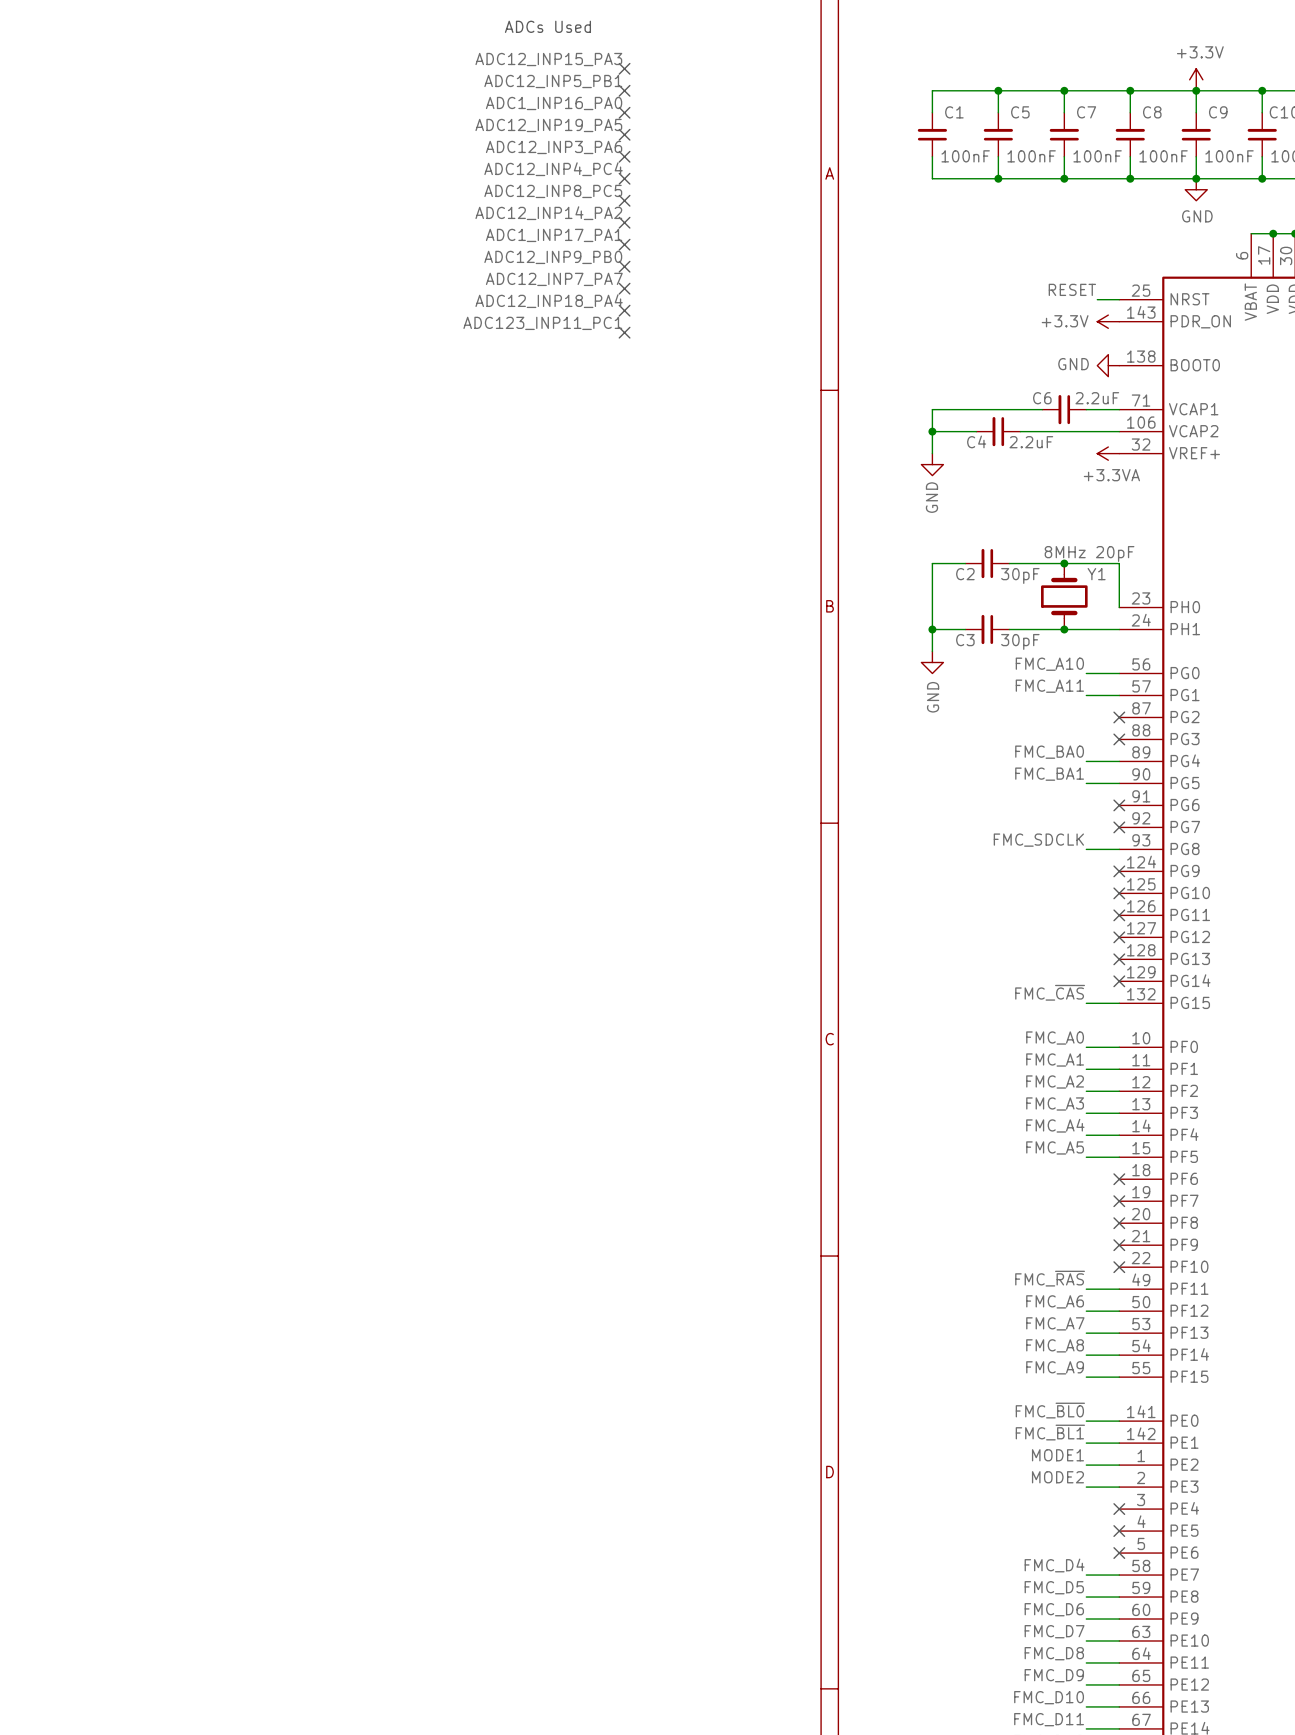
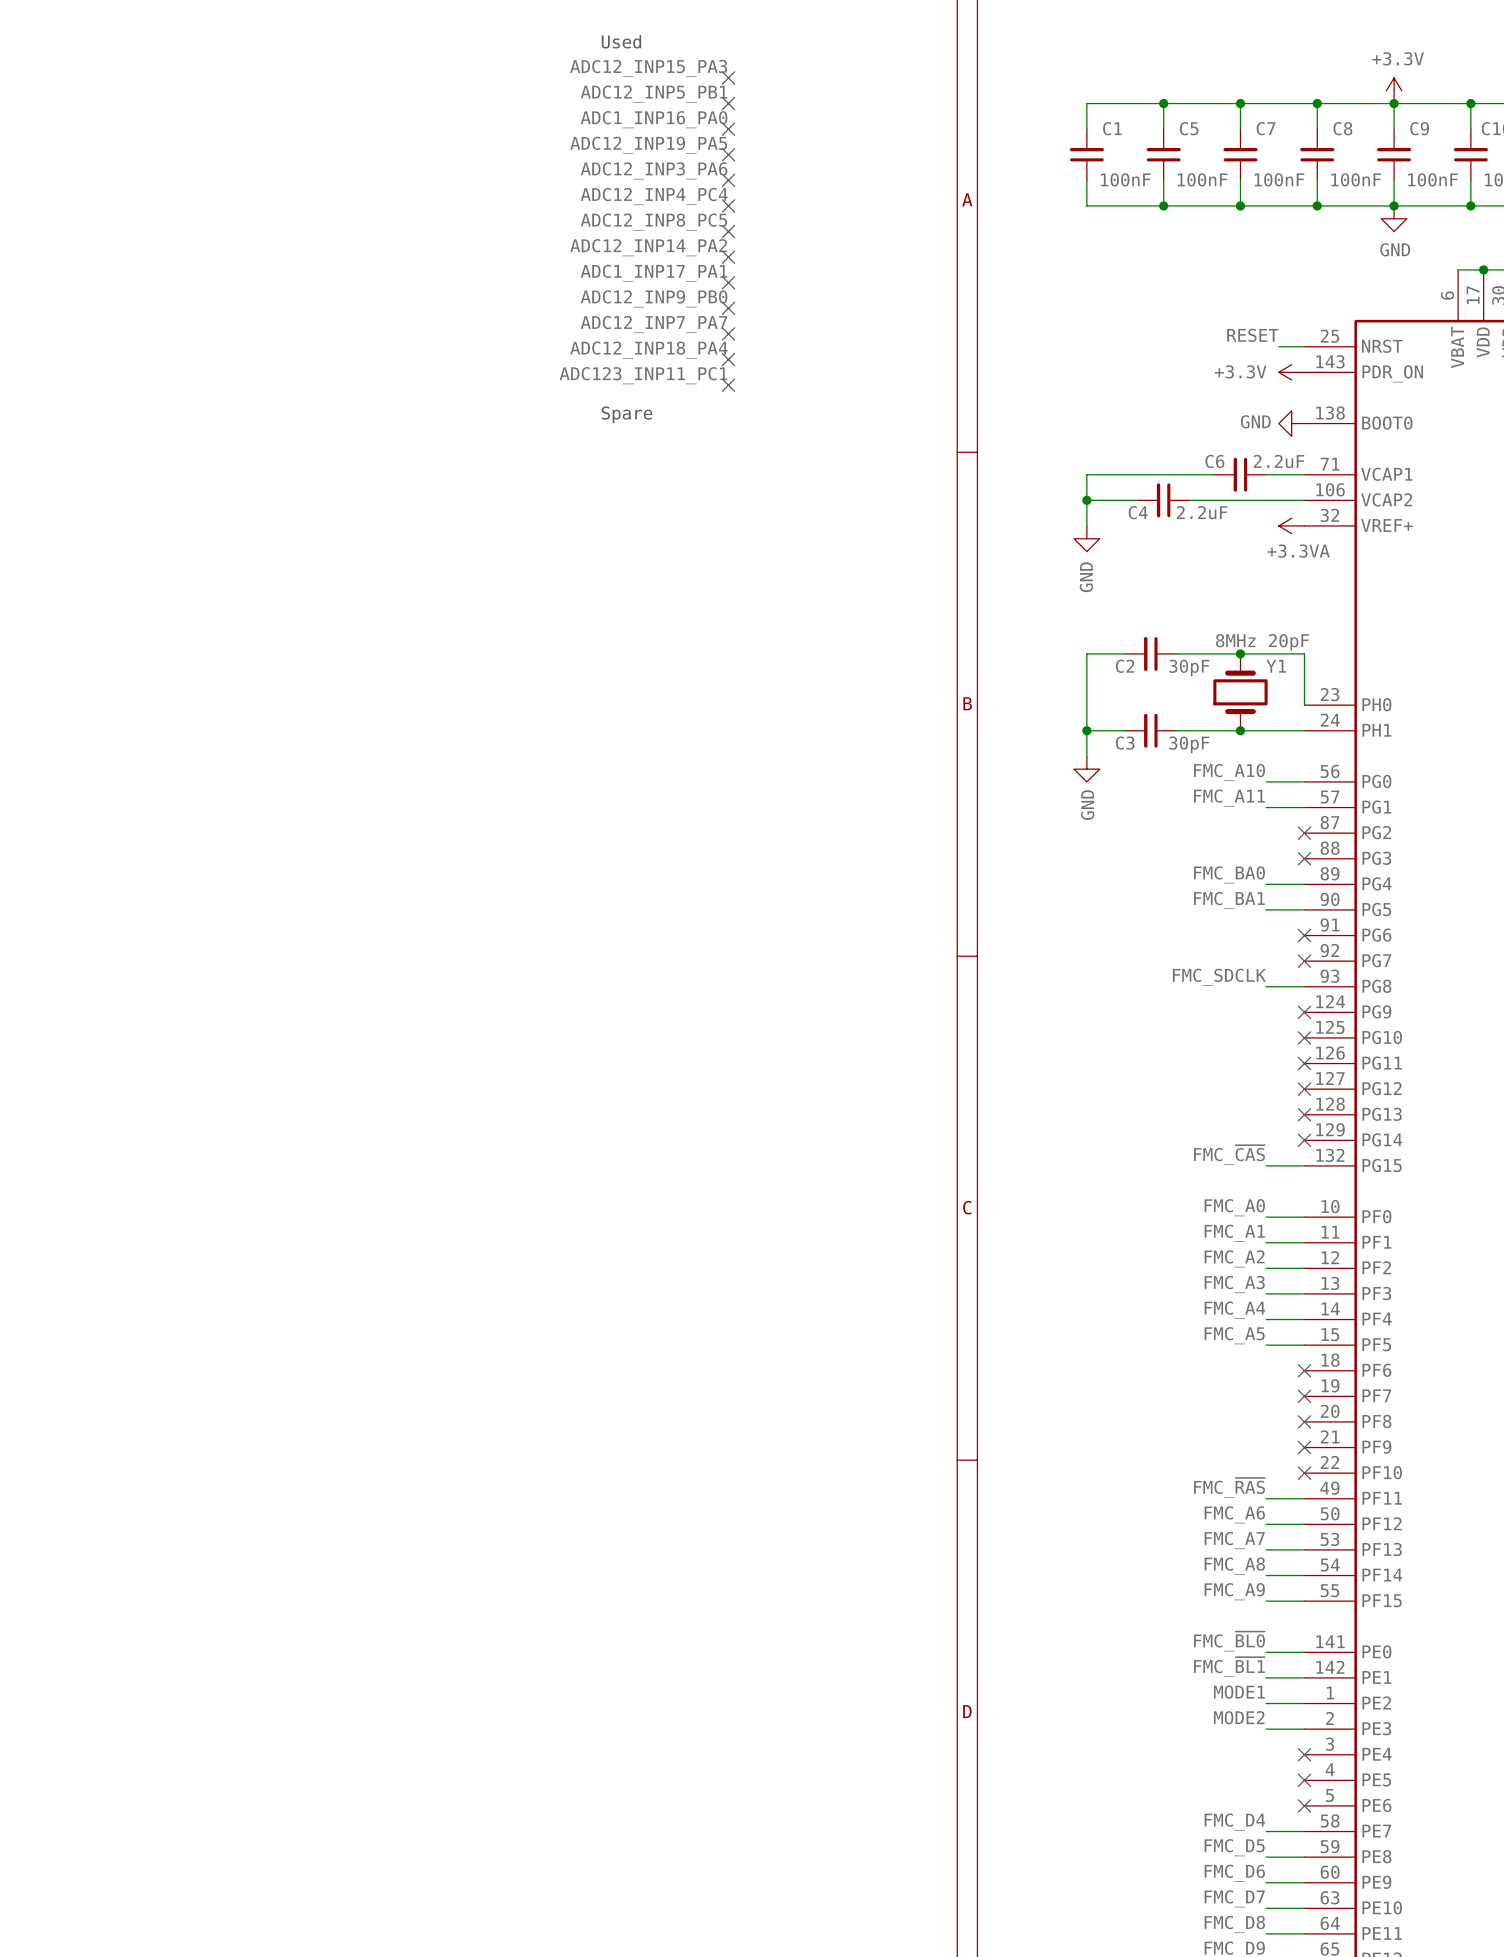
text: ADCs Used (547, 26) -> Used (621, 41)
text: none -> Spare (626, 414)

